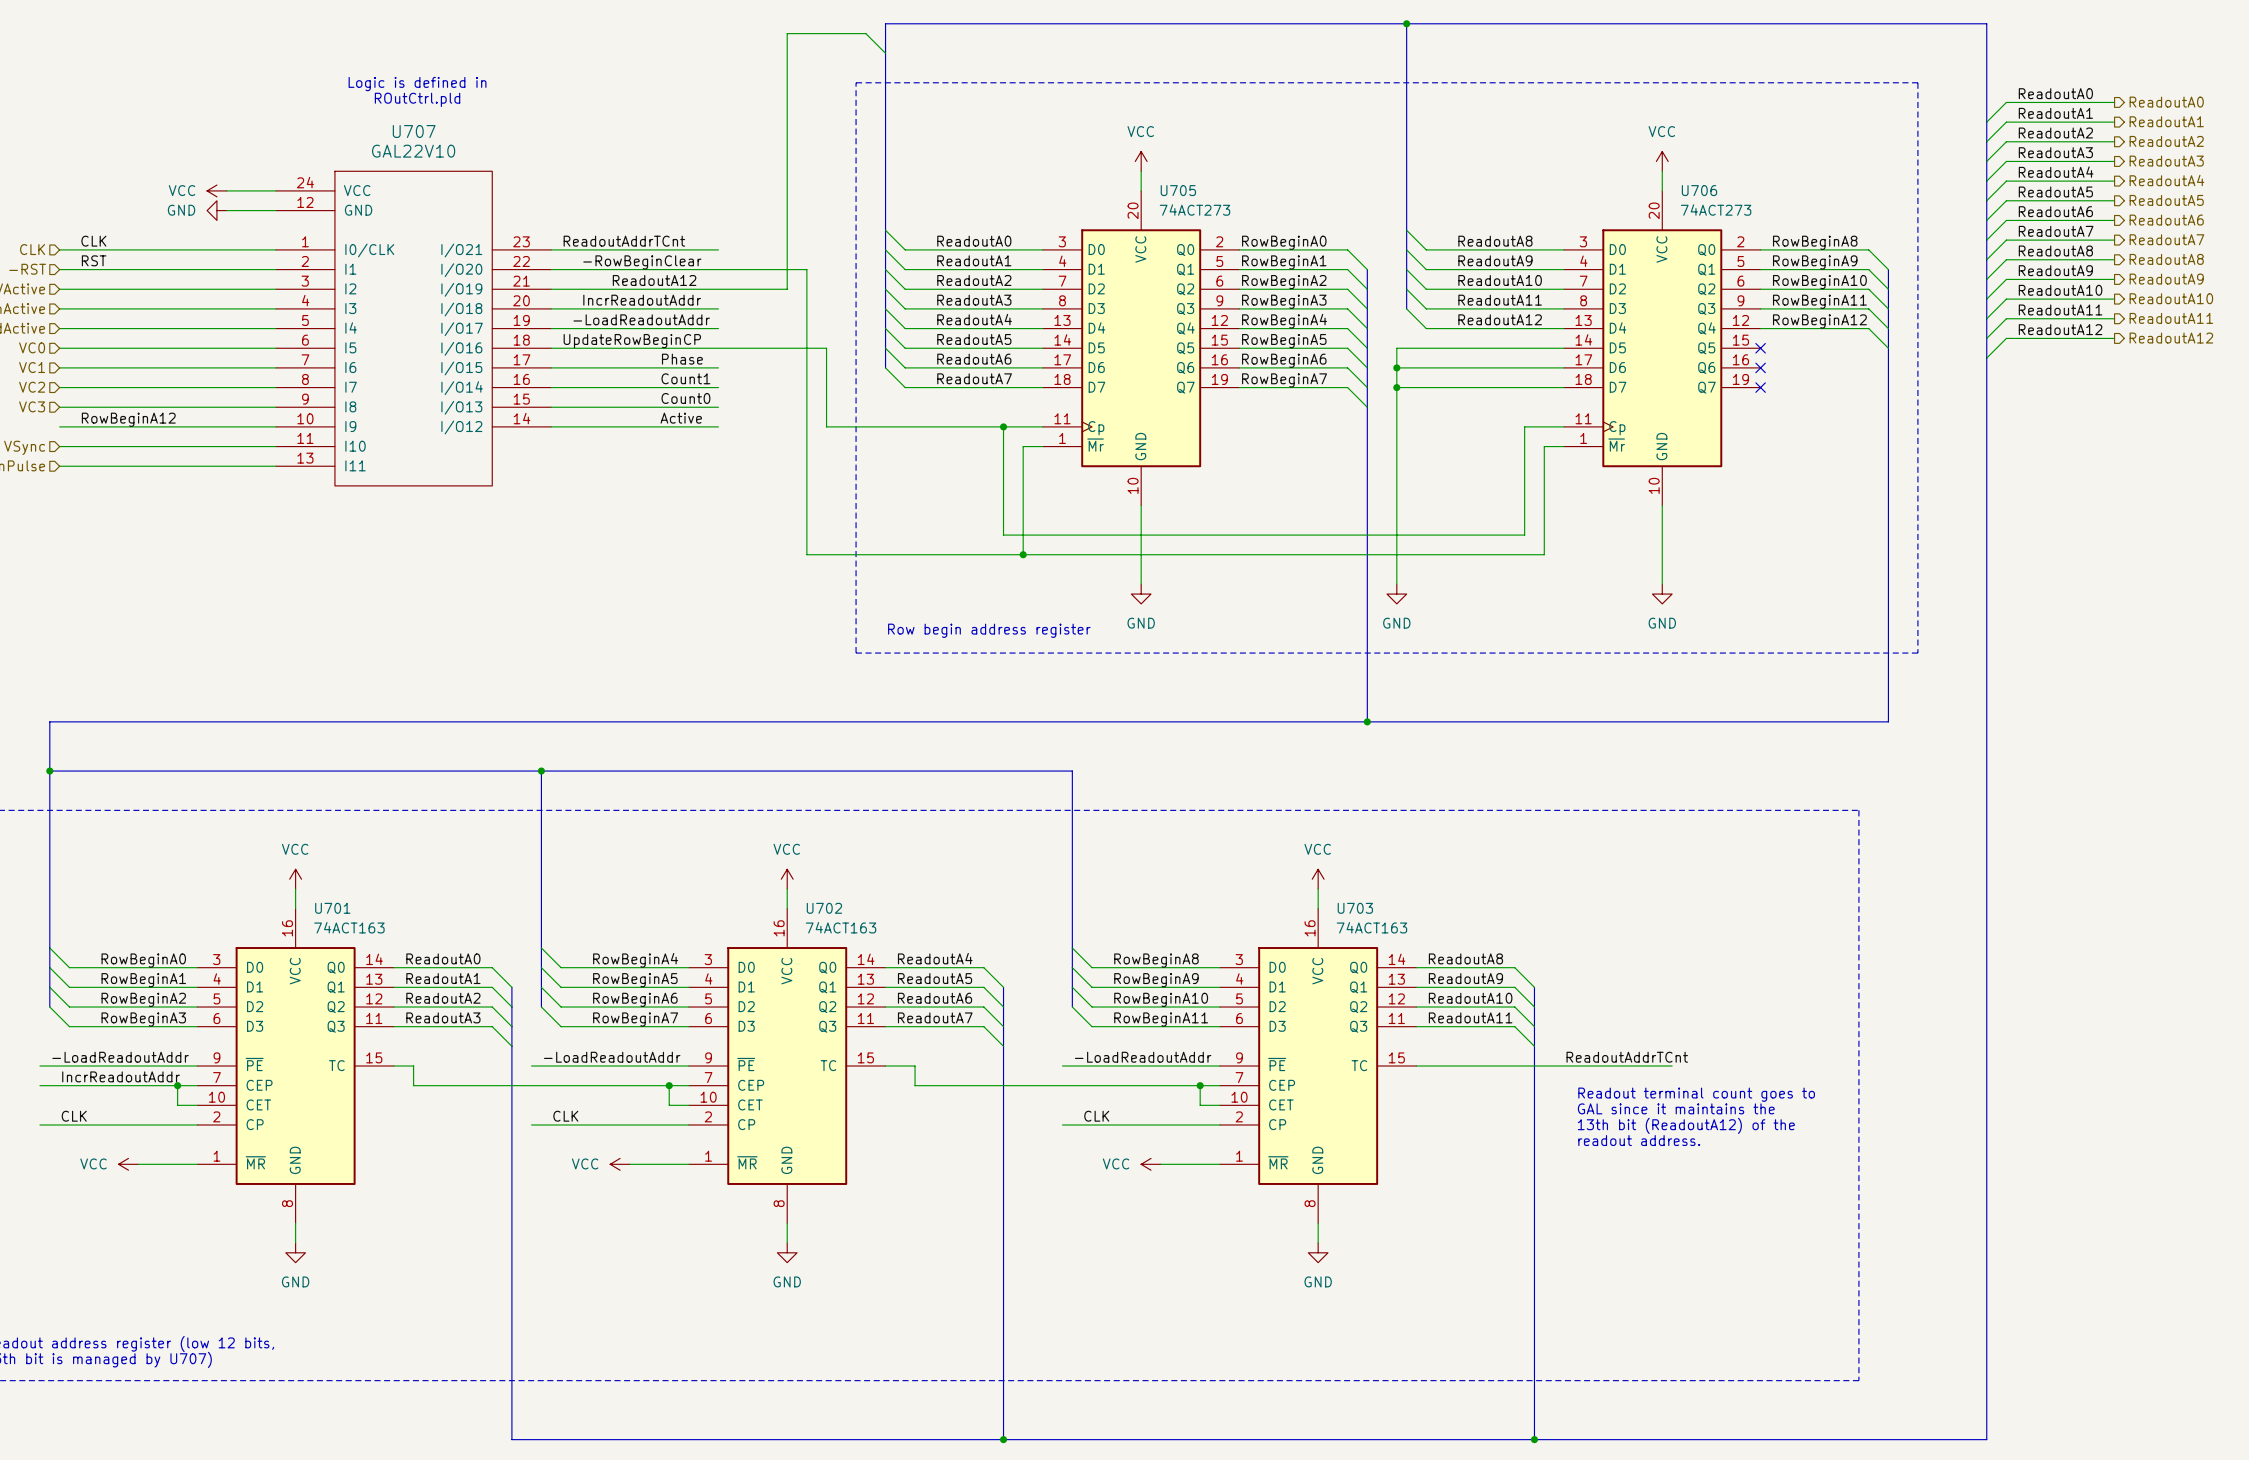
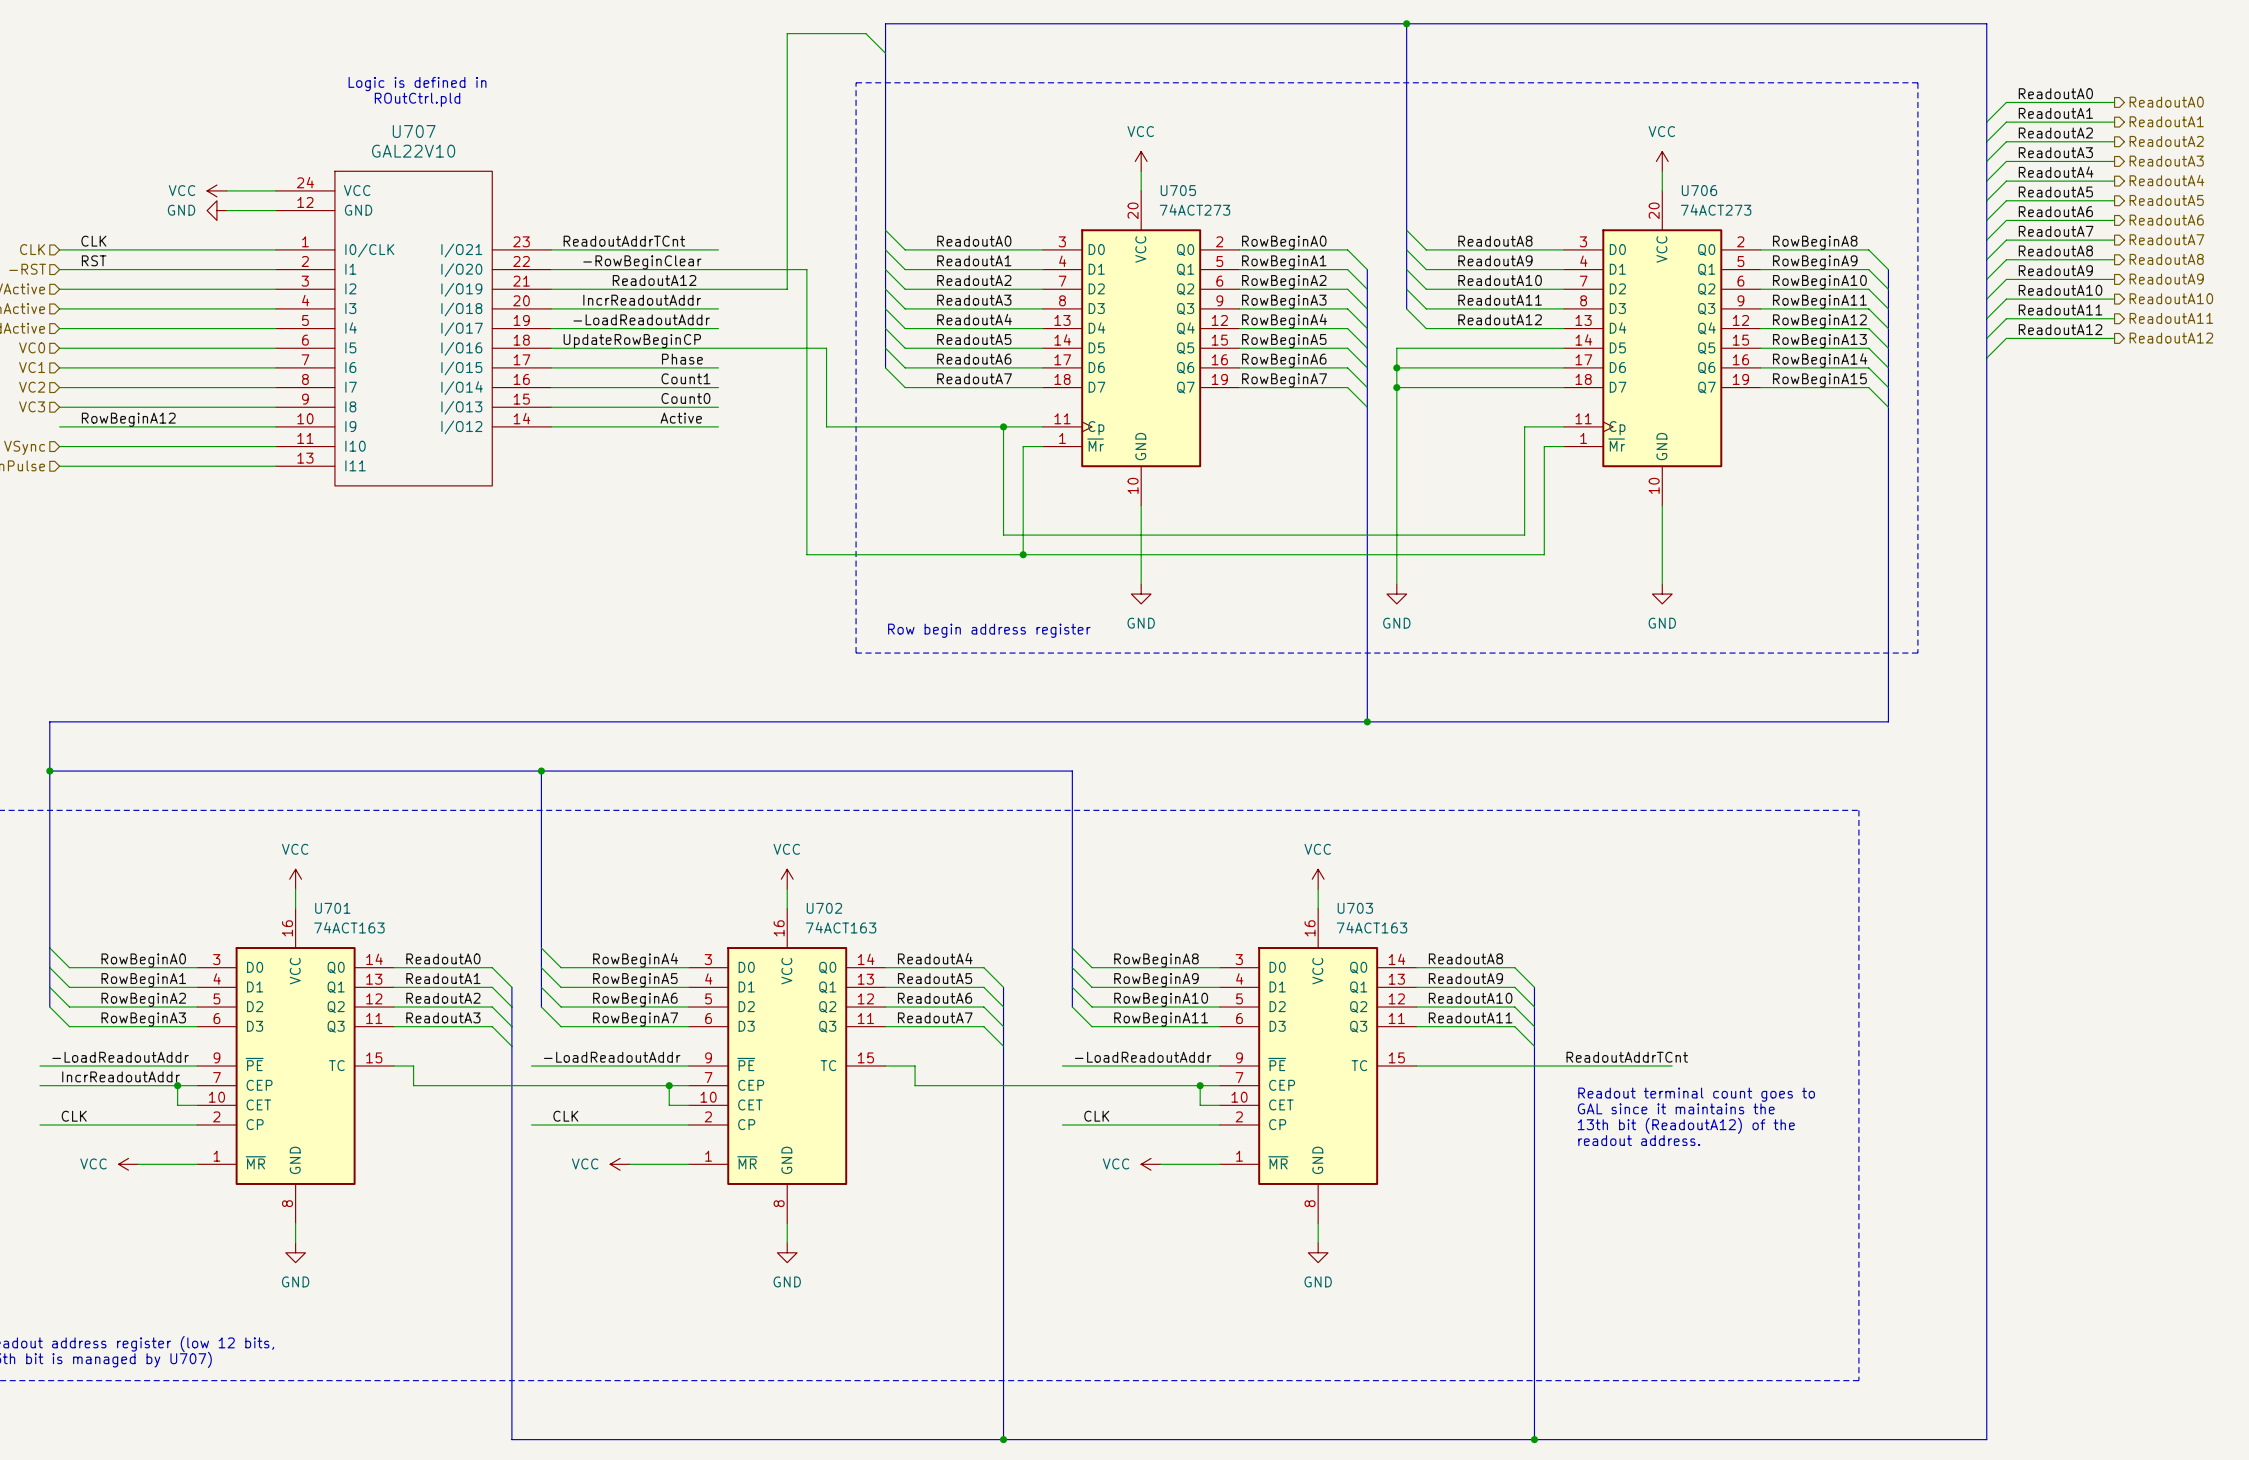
label: none -> RowBeginA13 (1819, 341)
wire: none -> (1760, 348) (1868, 348) (1888, 367)
no-connect mark: (1760, 348) -> none
label: none -> RowBeginA14 (1820, 360)
wire: none -> (1760, 367) (1868, 367) (1888, 387)
no-connect mark: (1760, 367) -> none
label: none -> RowBeginA15 (1819, 380)
wire: none -> (1760, 387) (1868, 387) (1888, 407)
no-connect mark: (1760, 387) -> none

